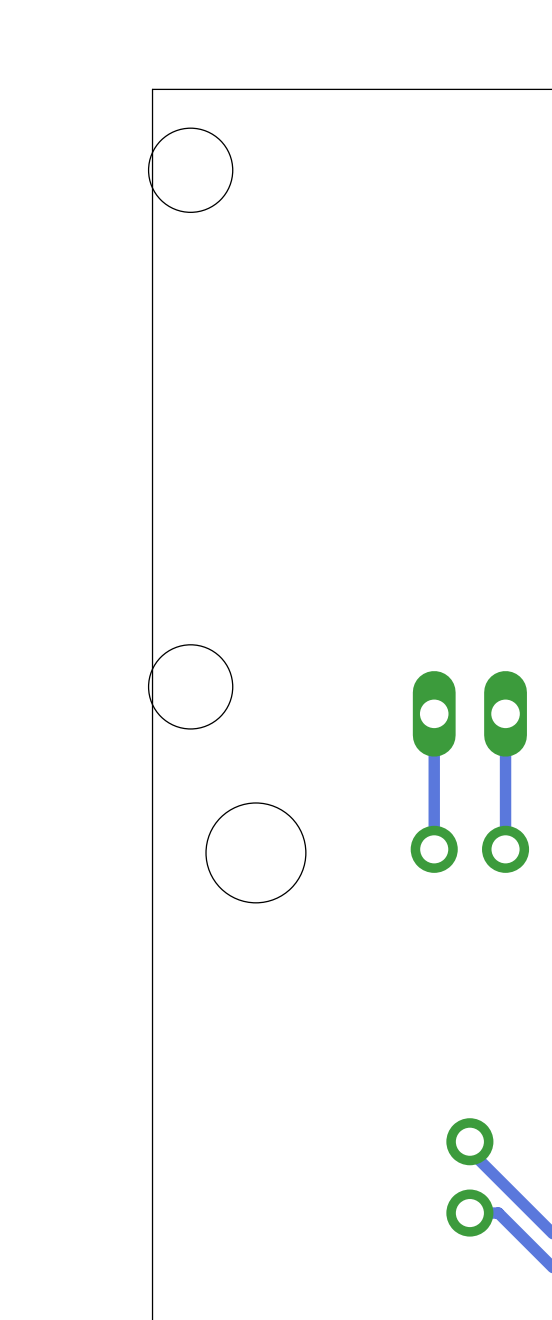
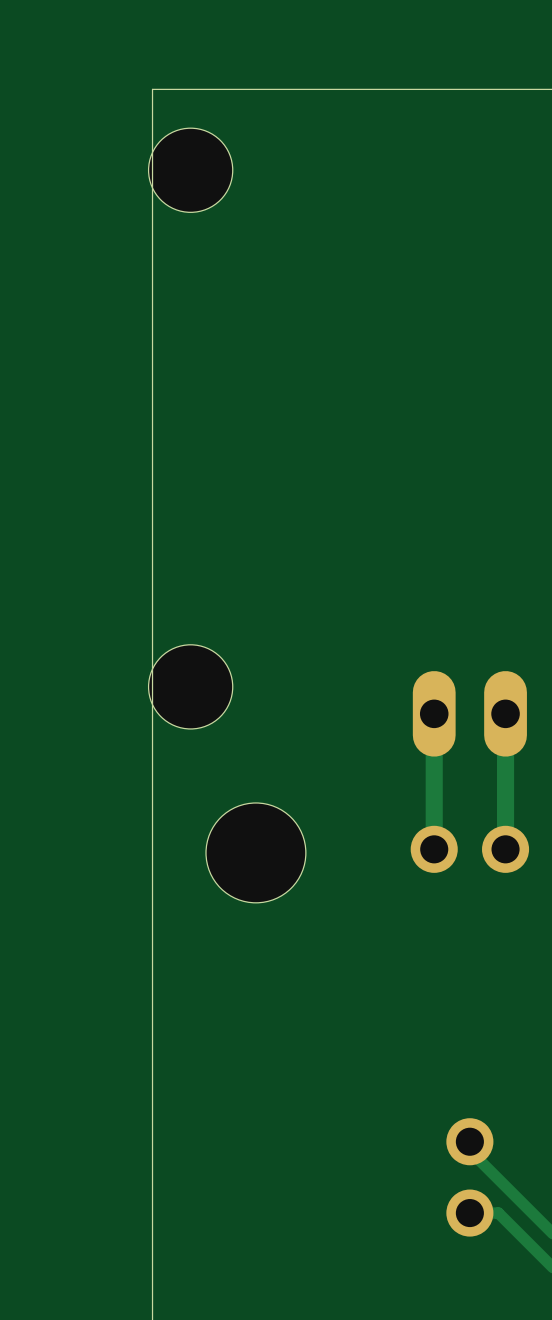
track width: thin (434, 713) (434, 849) -> thick (434, 713) (434, 849)
track width: thin (505, 713) (505, 849) -> thick (505, 713) (505, 849)

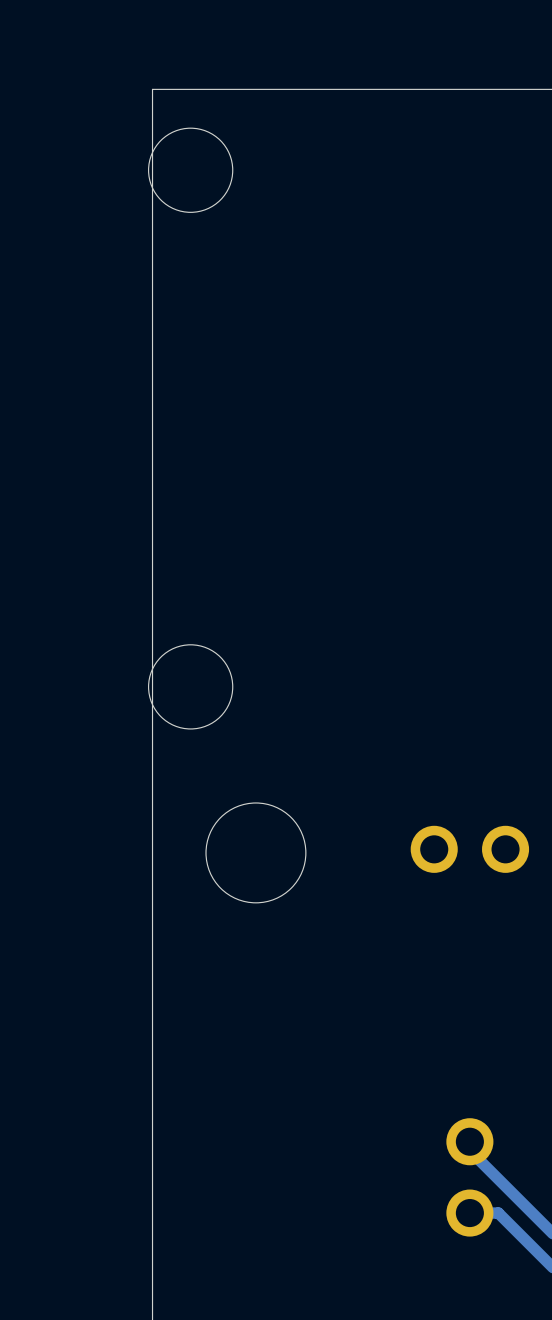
track: (434, 713) (434, 849) -> none
part: (469, 713) -> none
track: (505, 713) (505, 849) -> none

